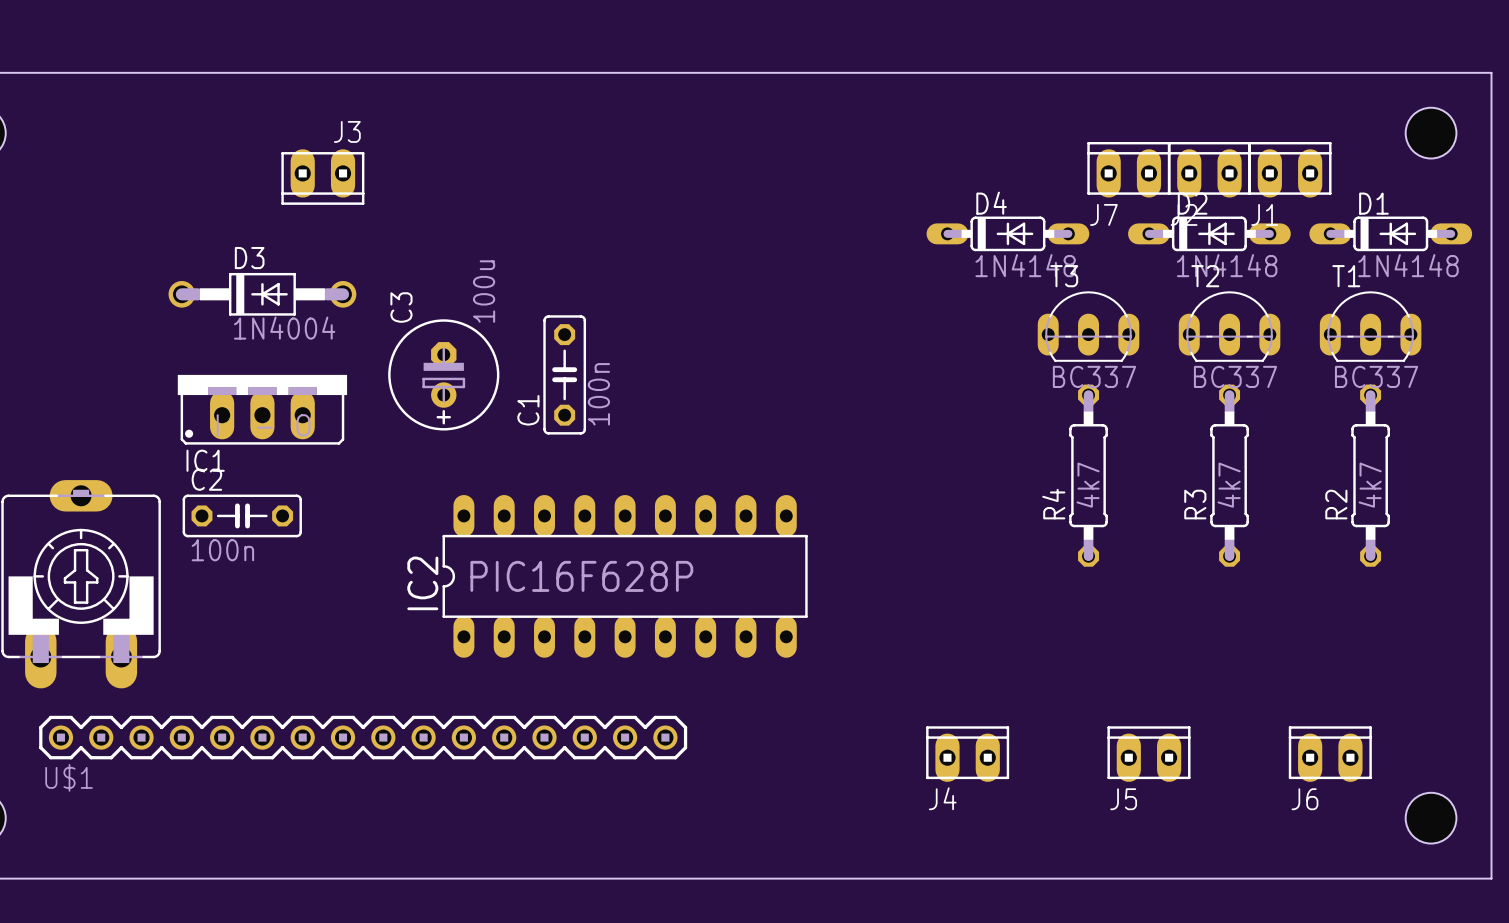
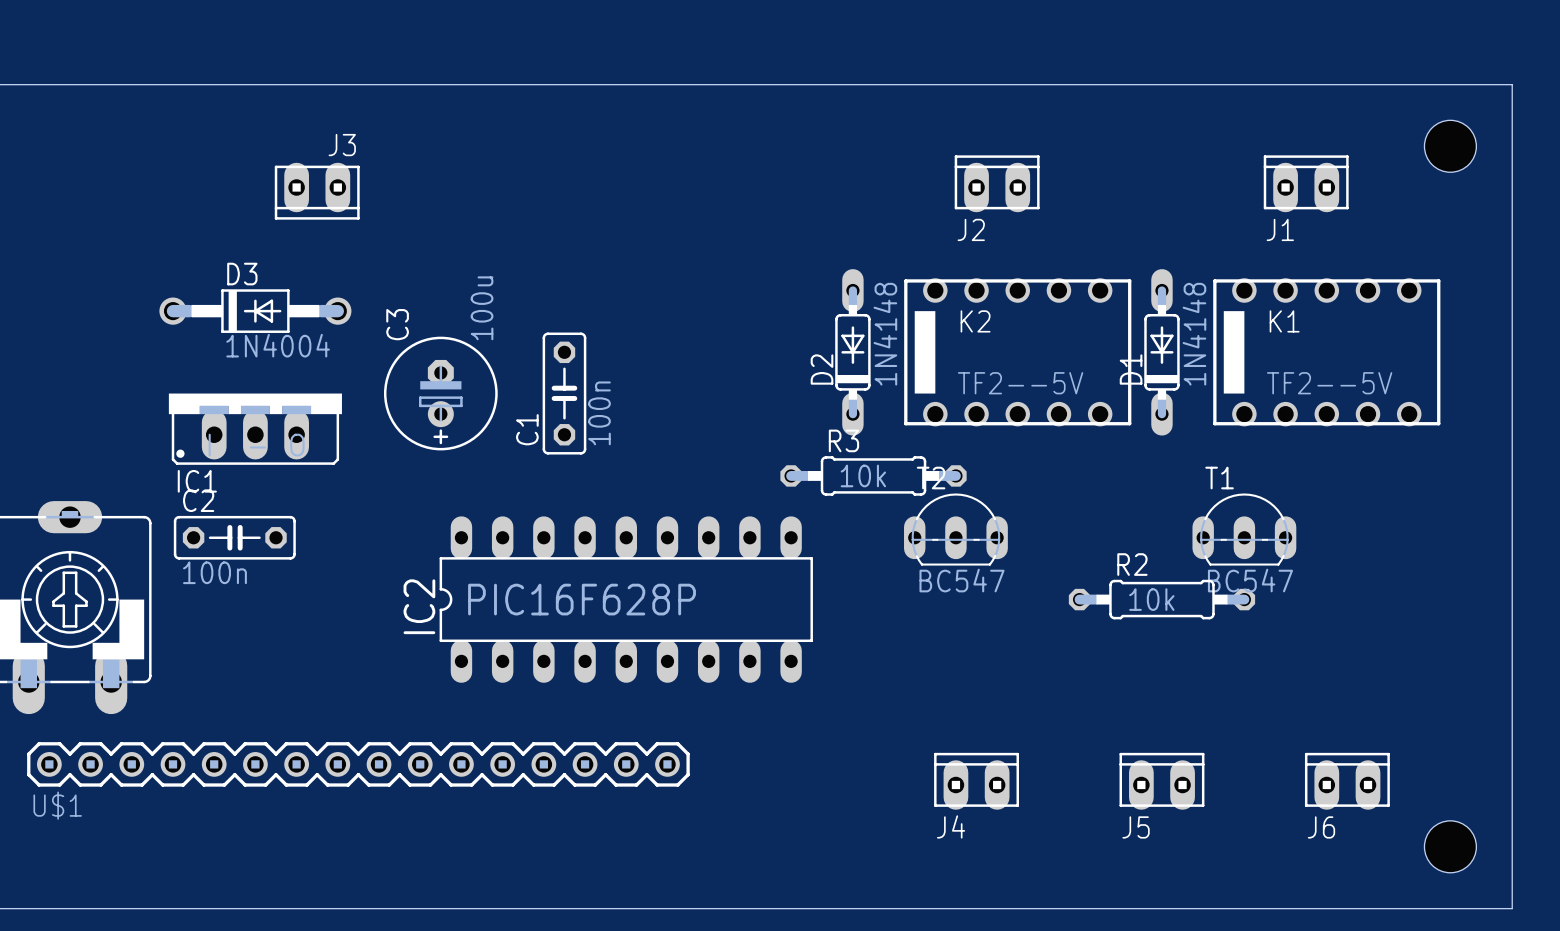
J7: (1128, 169) -> none
J2 position: (1209, 169) -> (997, 183)
D4: 1N4148 (1007, 233) -> none
D2 rotation: 0° (1209, 233) -> 90° counterclockwise (852, 352)
D2 position: (1209, 233) -> (852, 352)
D1 rotation: 0° (1390, 233) -> 90° counterclockwise (1161, 352)
D1 position: (1390, 233) -> (1161, 352)
T3: BC337 (1088, 326) -> none
T2 position: (1229, 326) -> (955, 529)
T1 position: (1370, 326) -> (1244, 529)
K2: none -> TF2--5V (1017, 352)
K1: none -> TF2--5V (1326, 352)
T2 value: BC337 (1235, 376) -> BC547 (962, 580)
T1 value: BC337 (1376, 376) -> BC547 (1250, 580)
R4: 4k7 (1088, 475) -> none
R3 rotation: 0° (1229, 475) -> 90° clockwise (873, 475)
R3 position: (1229, 475) -> (873, 475)
R2 rotation: 0° (1370, 475) -> 90° clockwise (1161, 599)
R2 position: (1370, 475) -> (1161, 599)
R3 value: 4k7 (1229, 485) -> 10k (863, 475)
R2 value: 4k7 (1370, 485) -> 10k (1151, 599)

